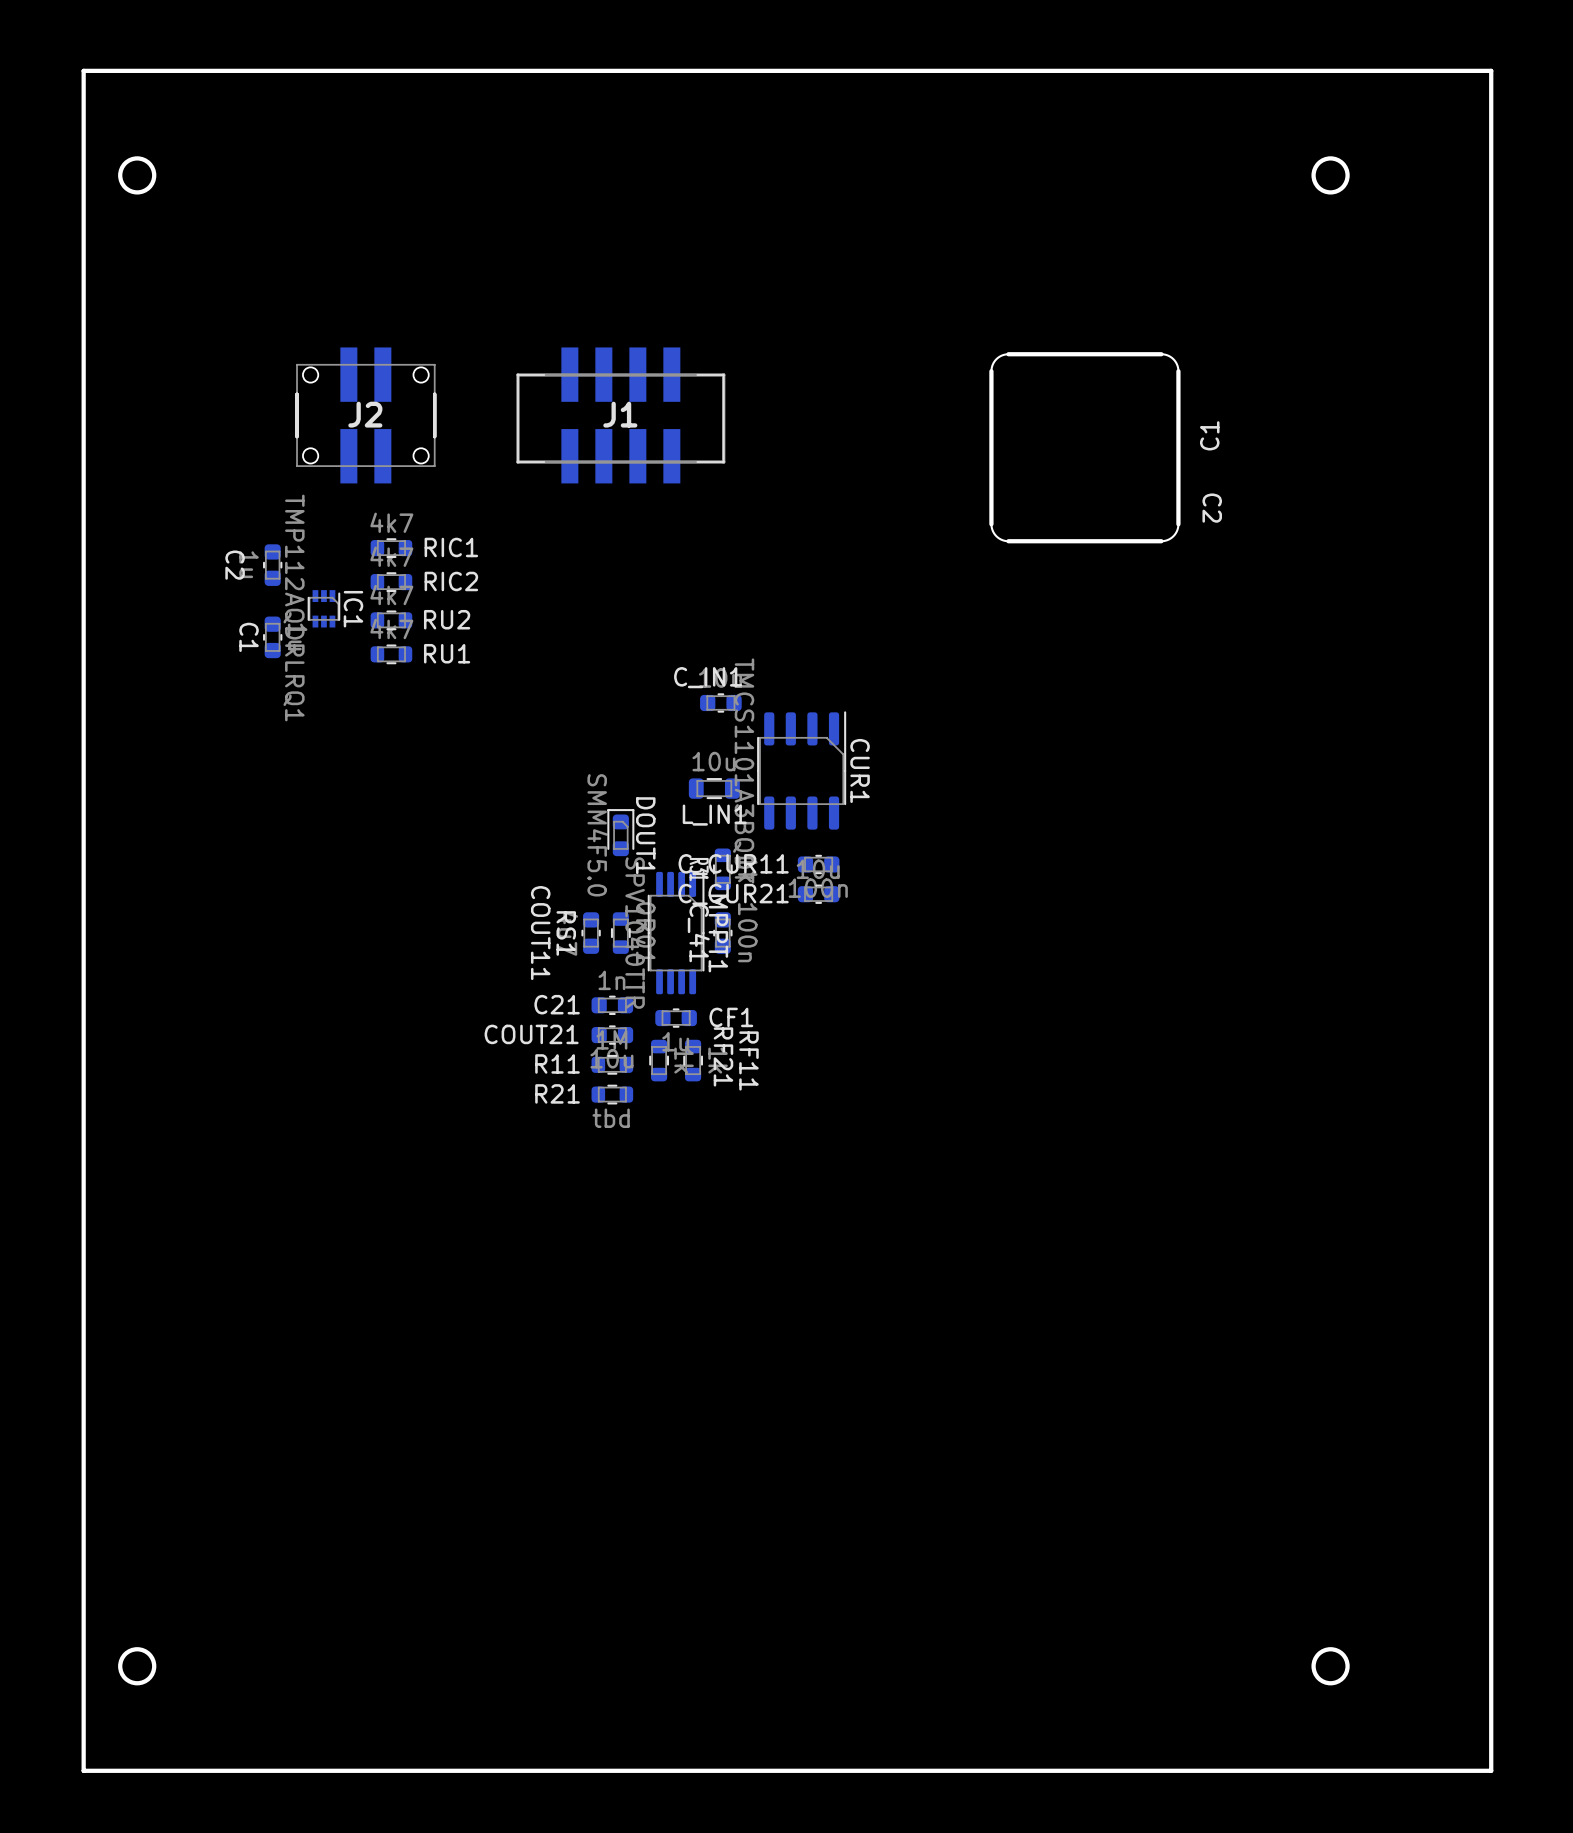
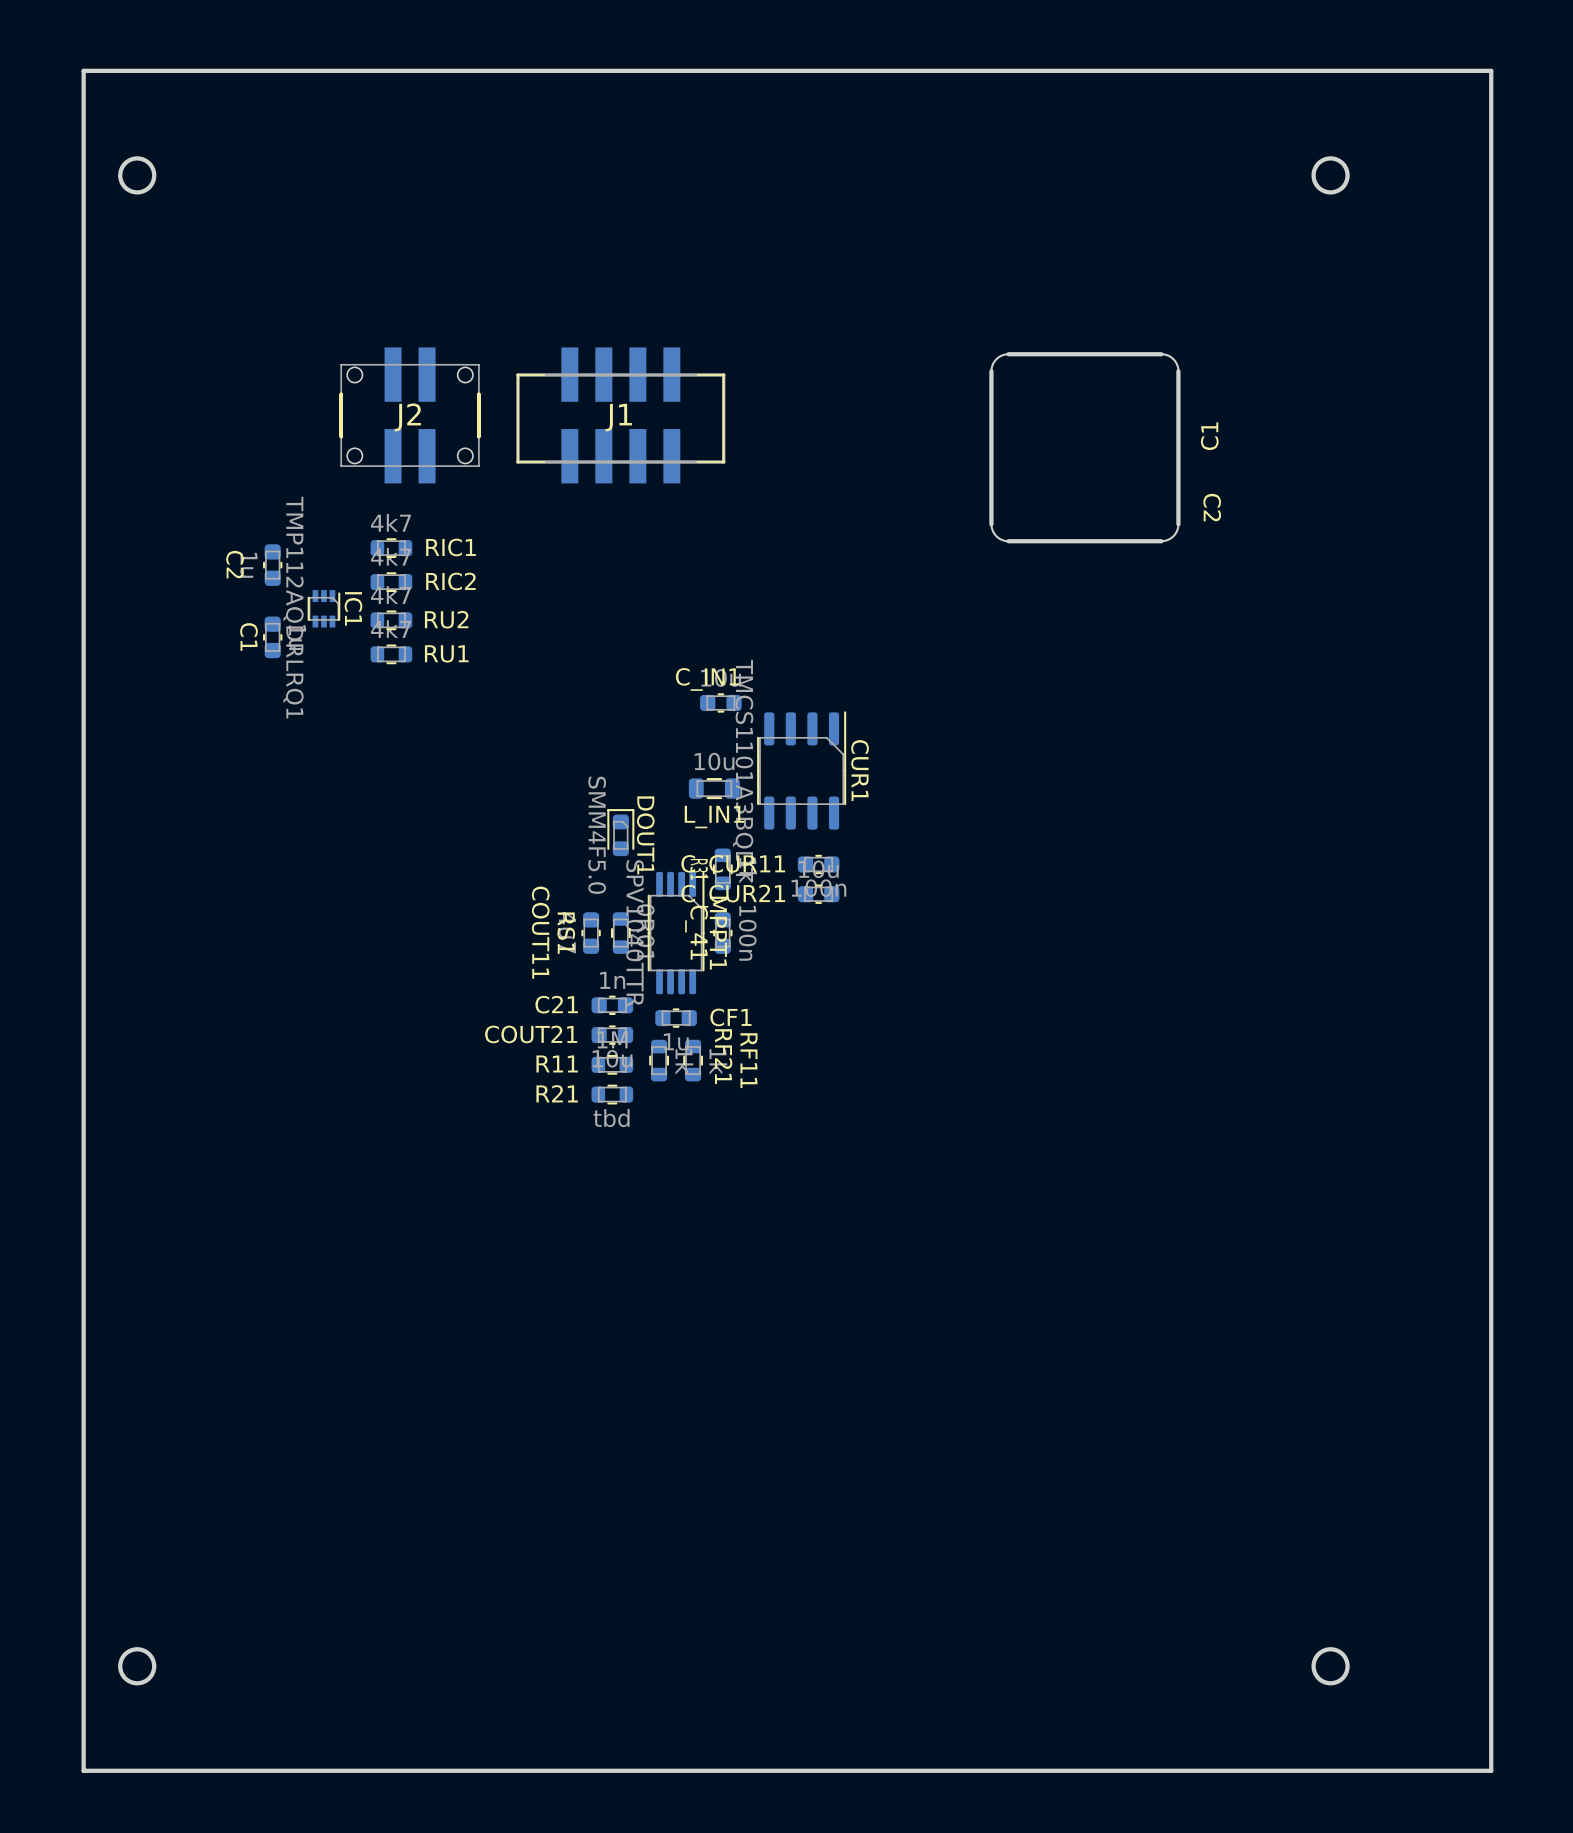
J2 position: (365, 415) -> (410, 415)

